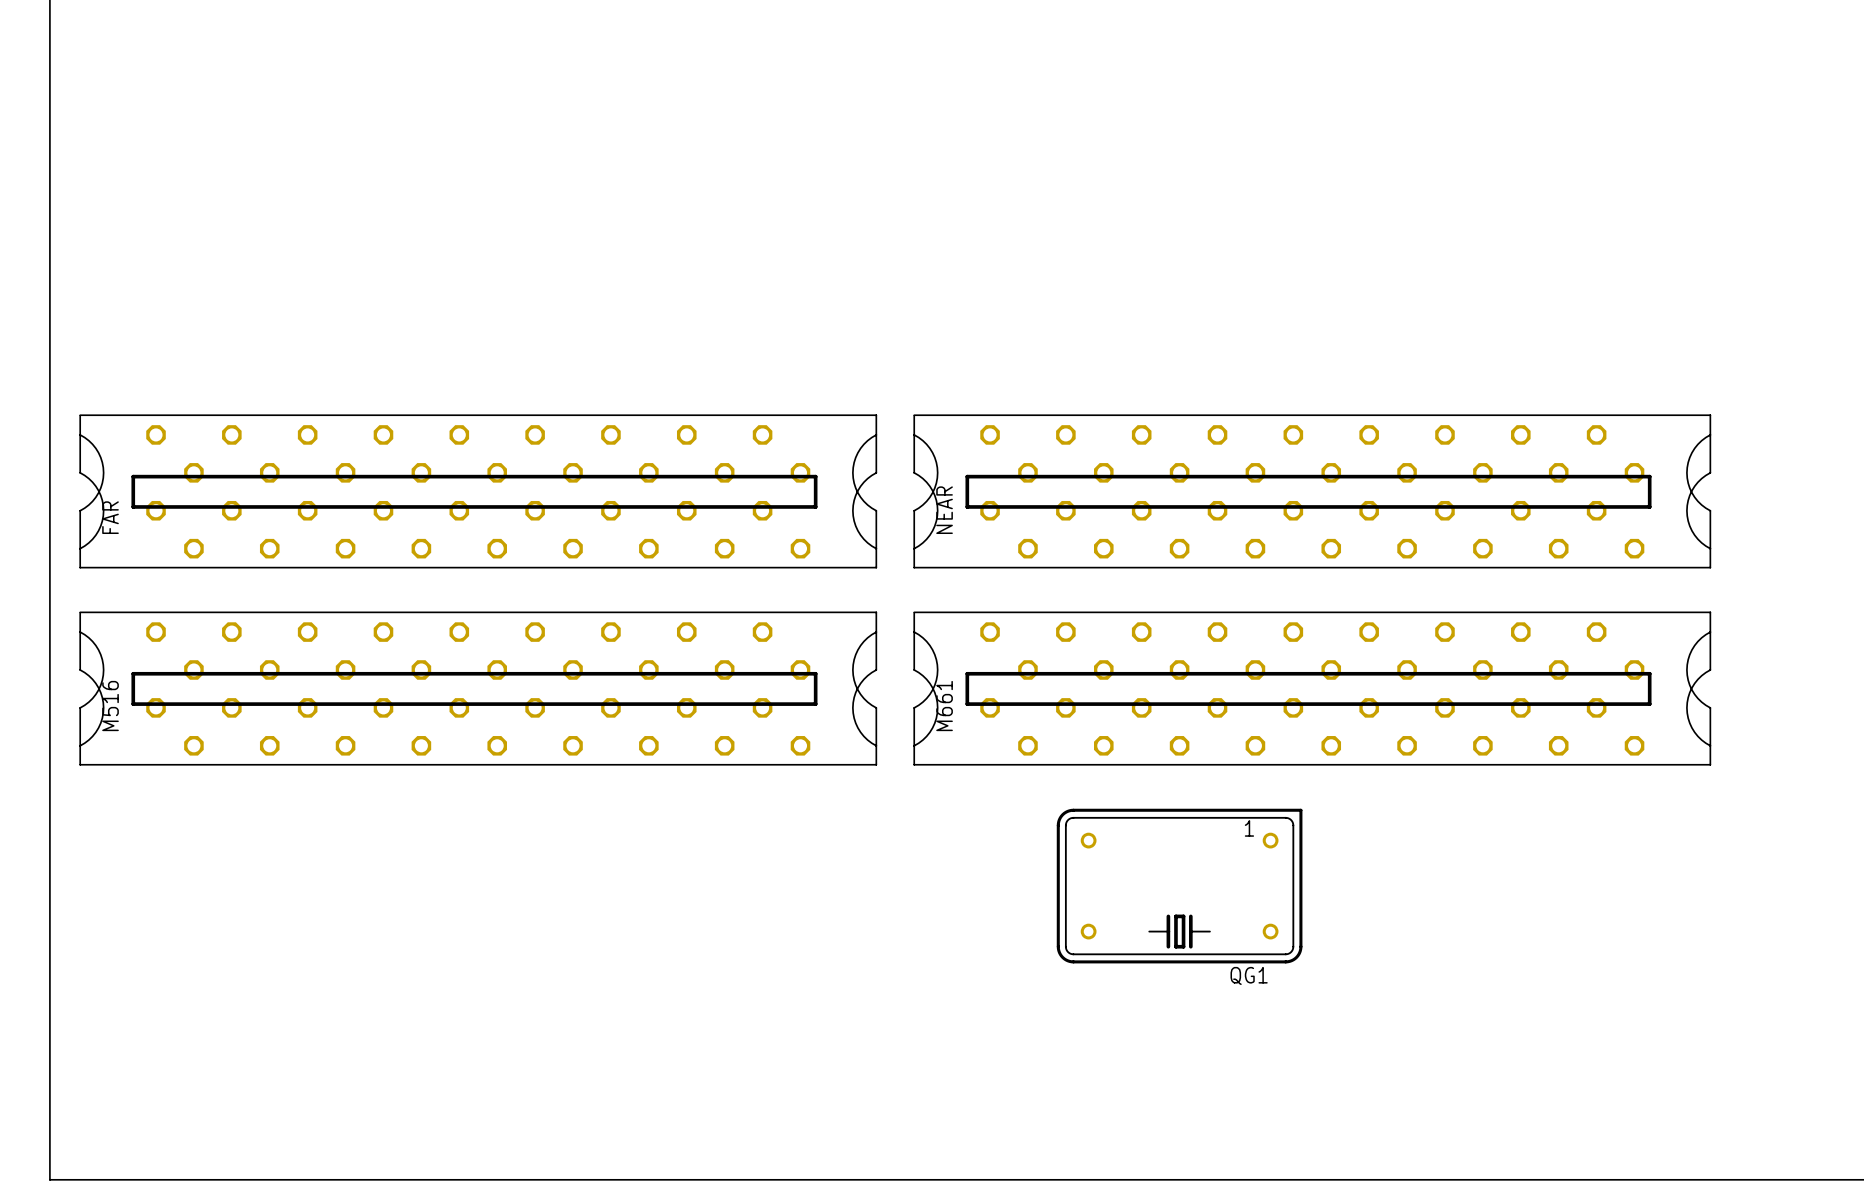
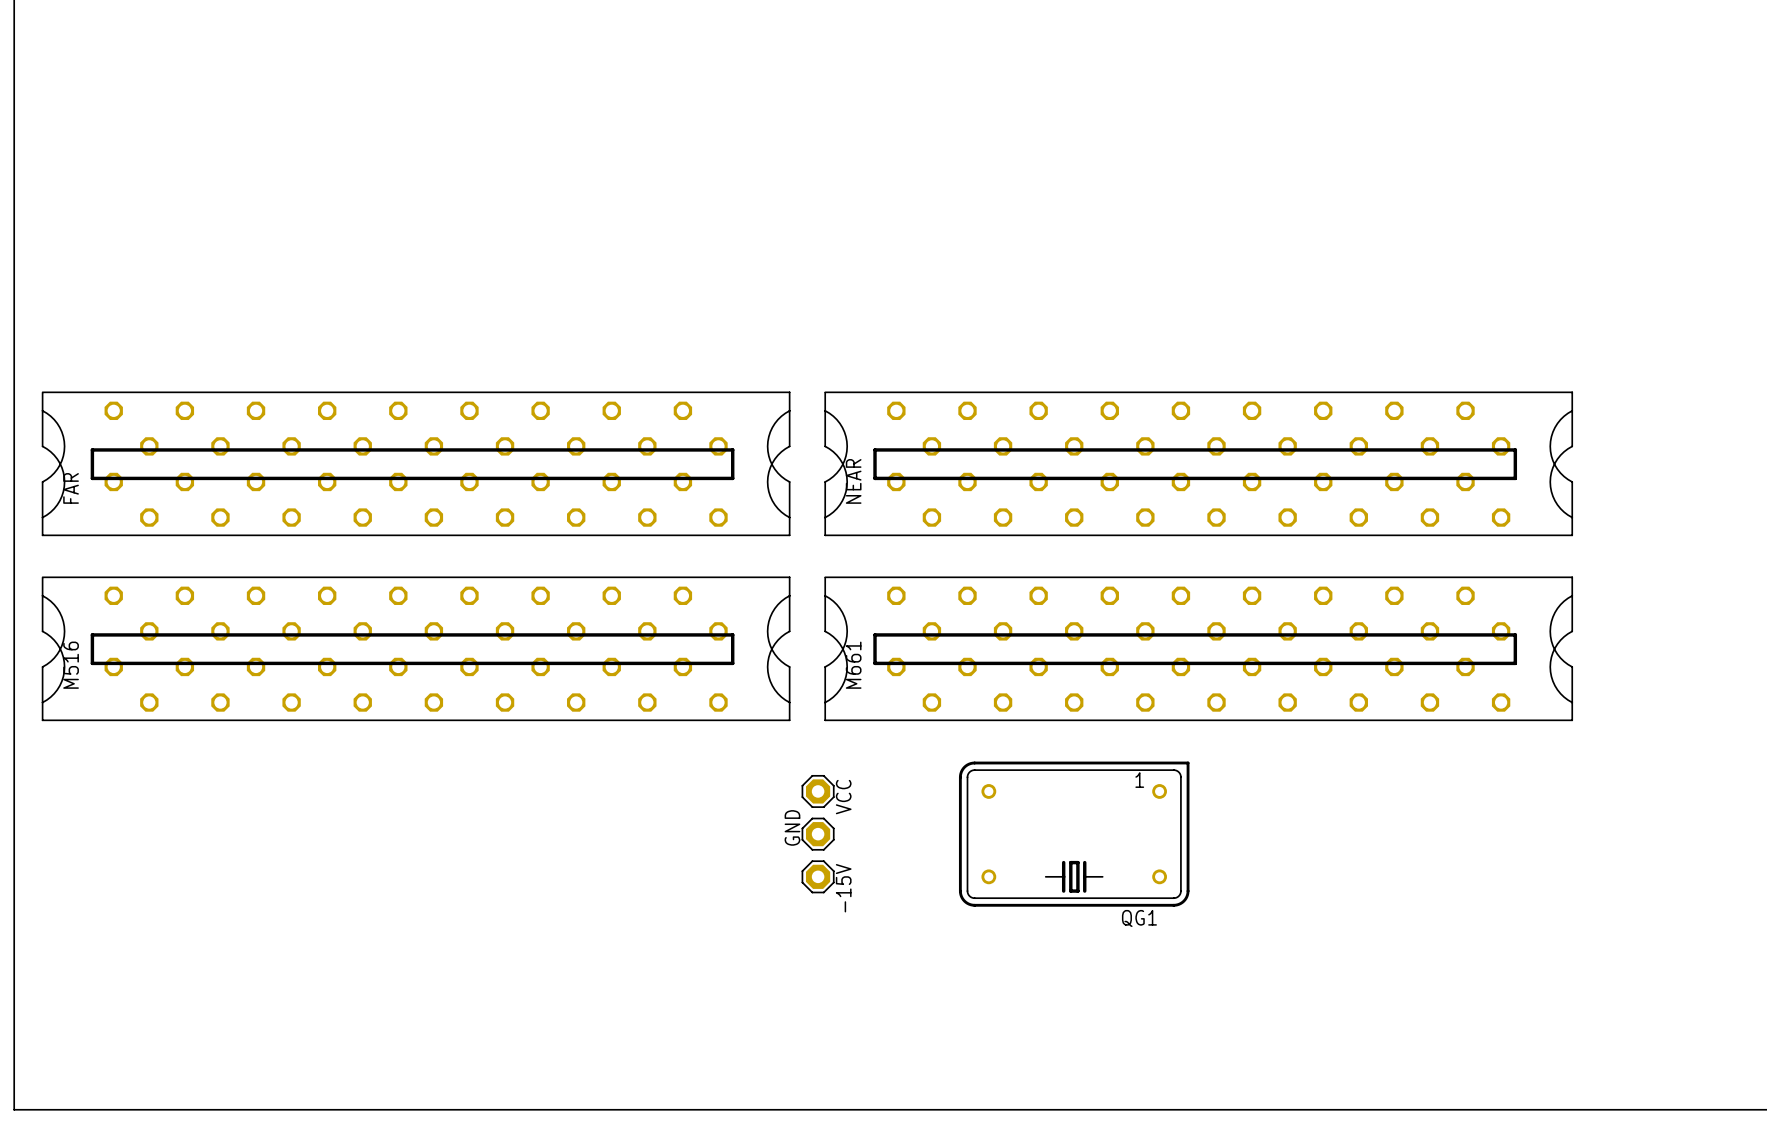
VCC: none -> (818, 791)
GND: none -> (818, 834)
-15V: none -> (818, 876)

